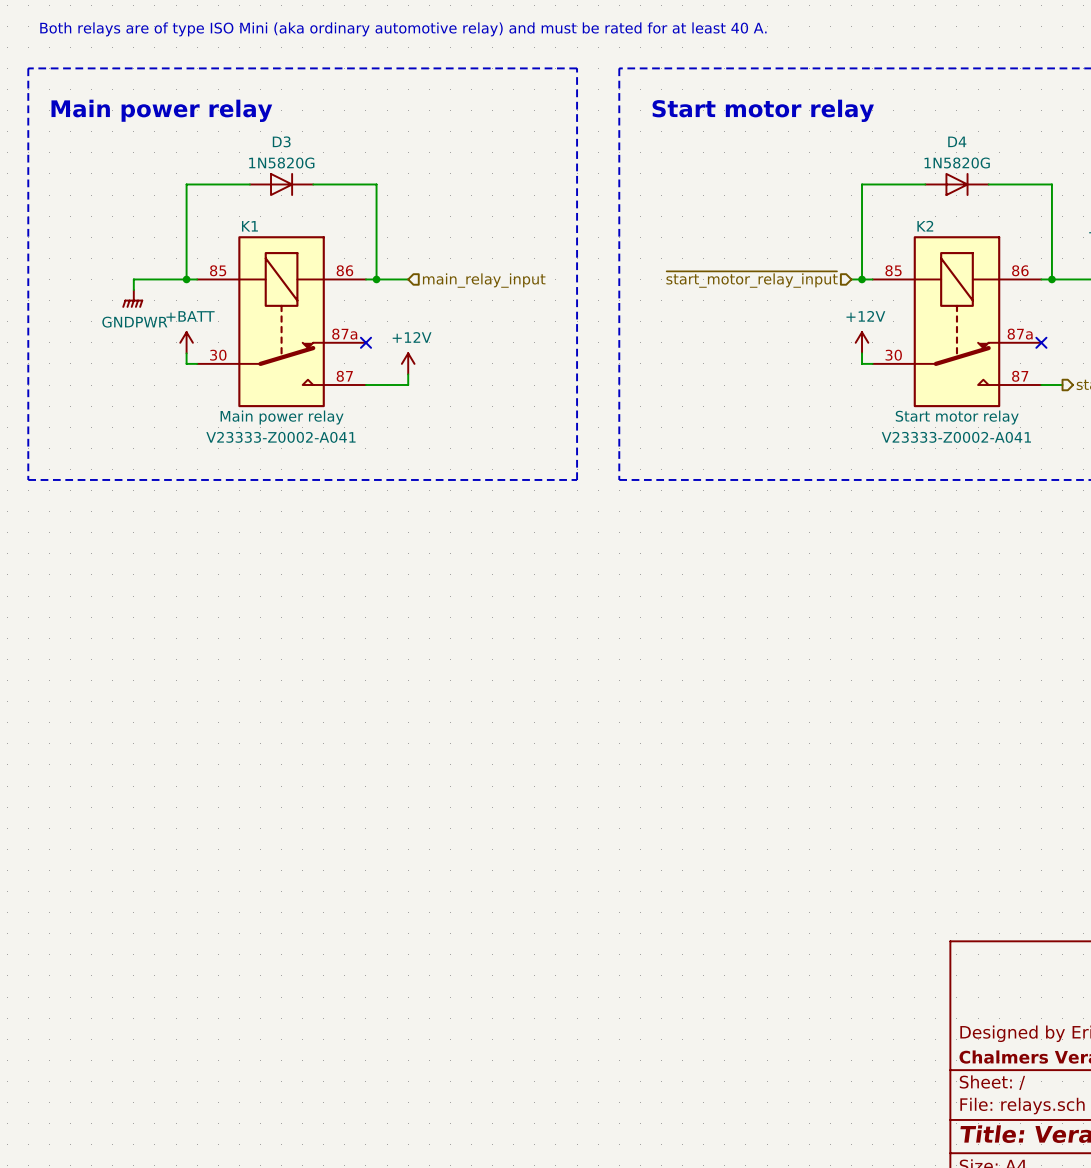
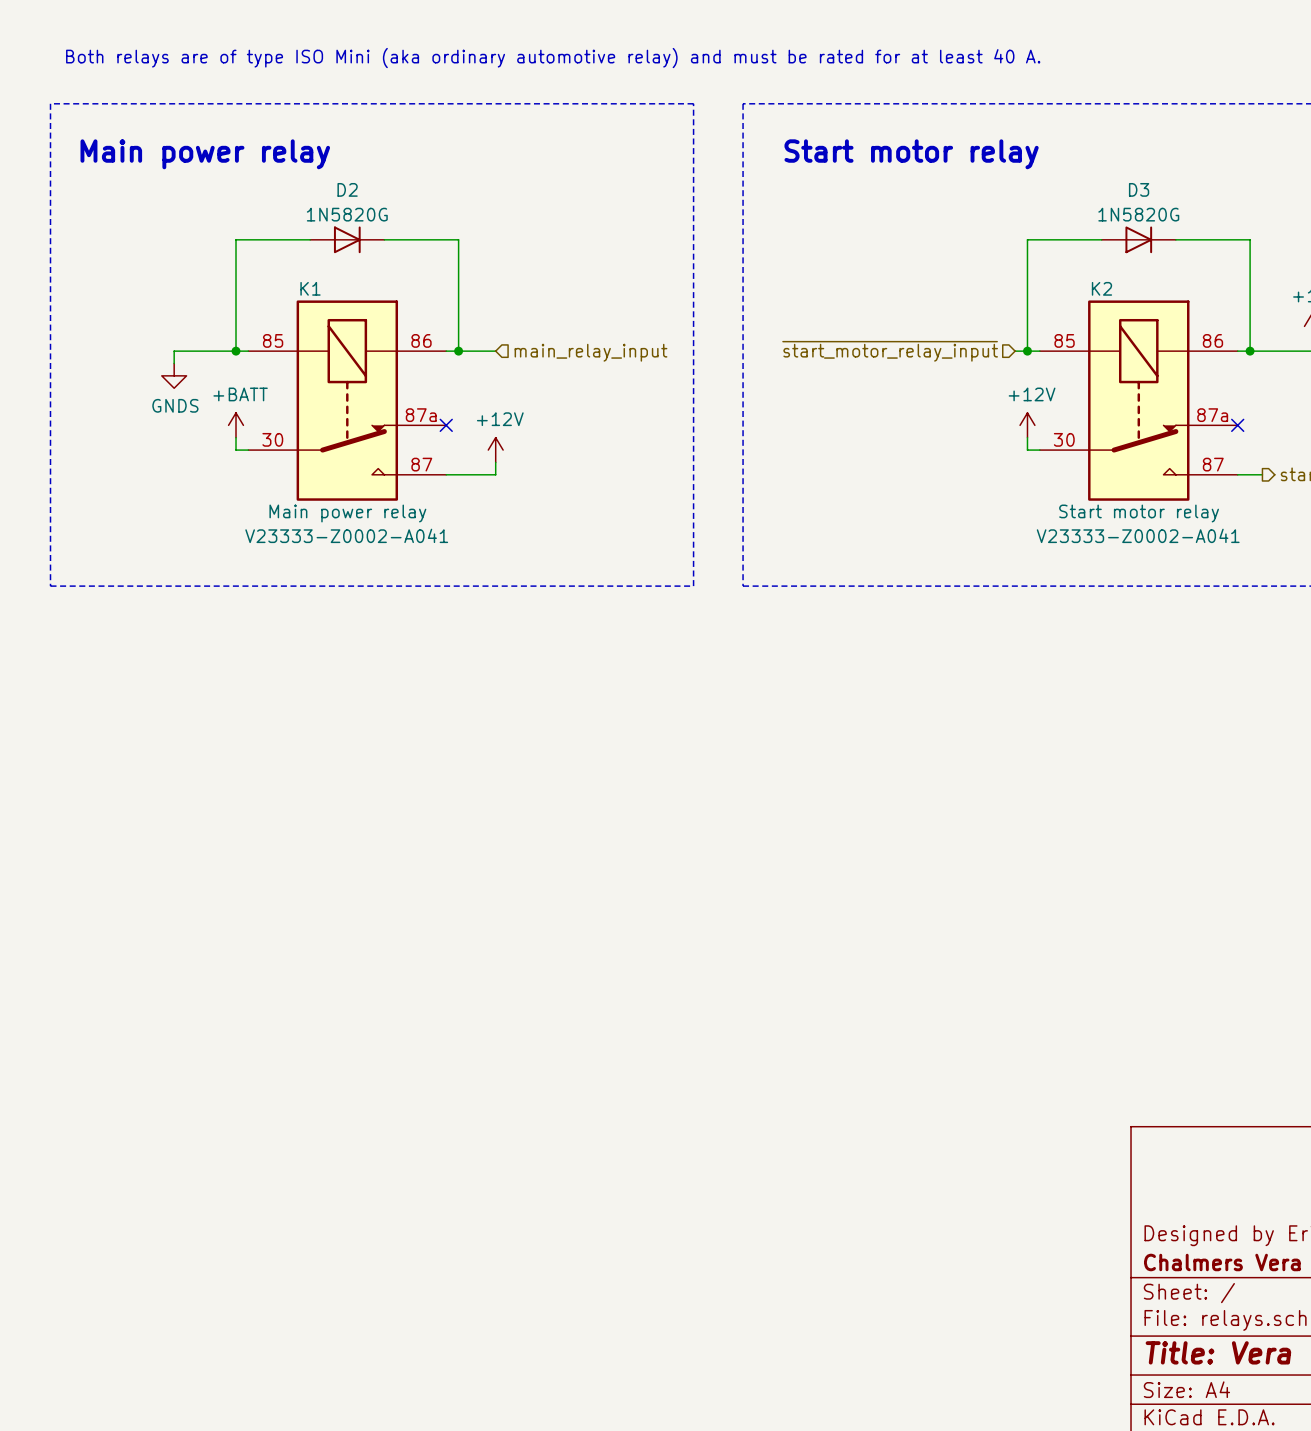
D3 name: D3 (281, 141) -> D2 (347, 189)
D4 name: D4 (957, 141) -> D3 (1139, 189)
power symbol: GNDPWR (132, 298) -> GNDS (174, 375)

